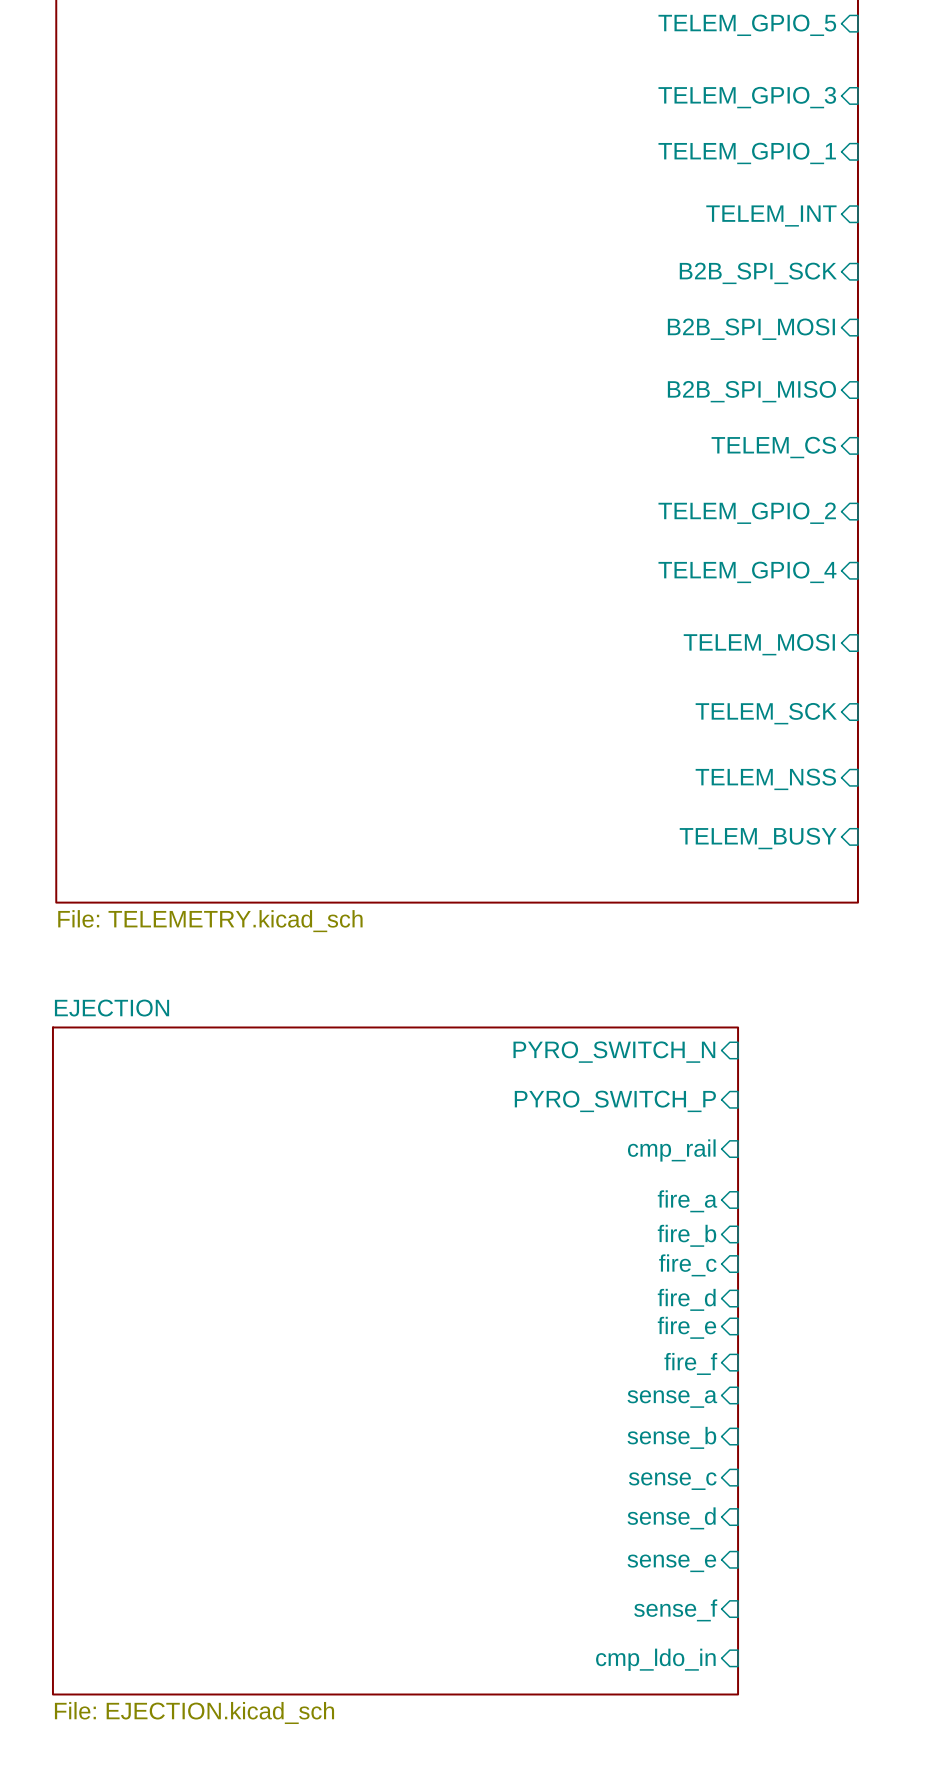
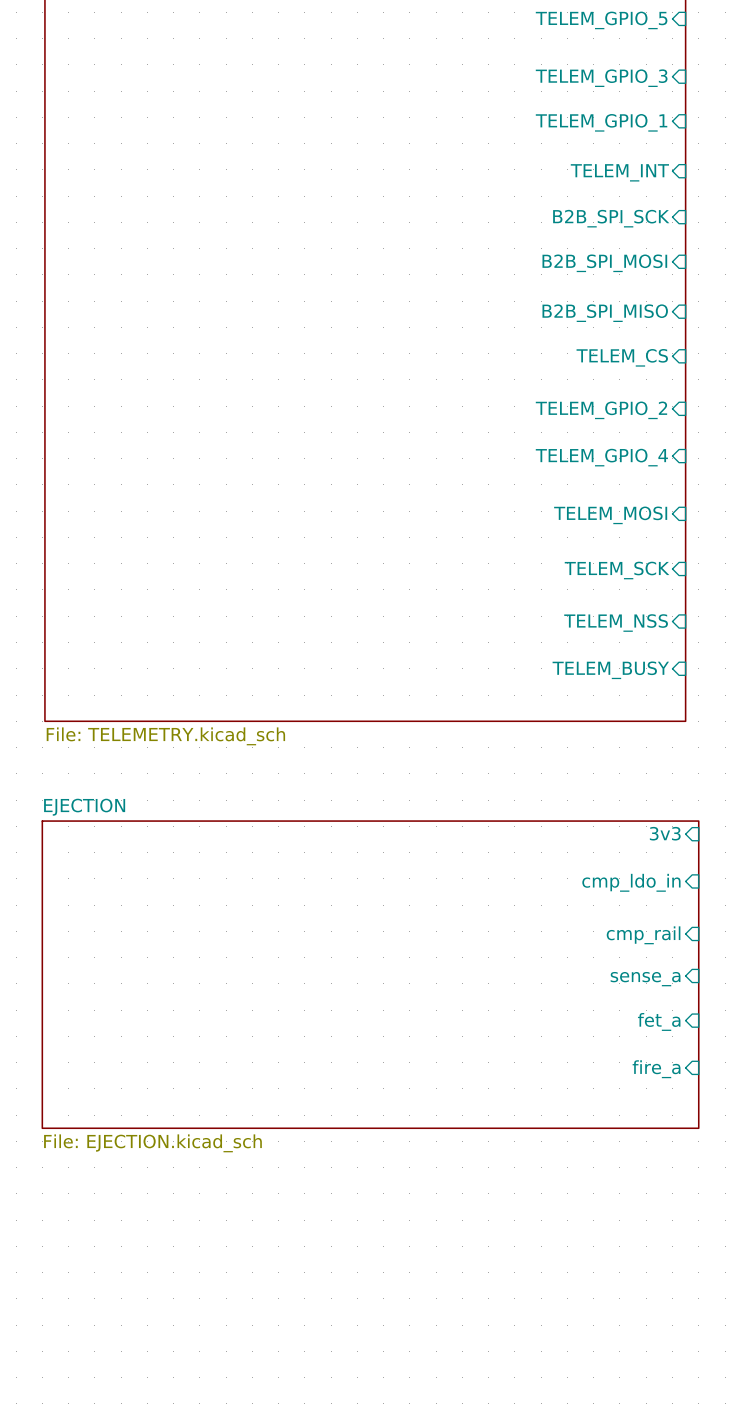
sheet pin: none -> 3v3 (665, 833)
sheet pin: PYRO_SWITCH_N (614, 1052) -> none
sheet pin: PYRO_SWITCH_P (615, 1101) -> none
sheet pin: none -> cmp_ldo_in (631, 882)
sheet pin position: cmp_rail (671, 1150) -> cmp_rail (643, 935)
sheet pin position: fire_a (687, 1201) -> fire_a (656, 1069)
sheet EJECTION: none -> File: EJECTION.kicad_sch (370, 974)
sheet pin: fire_b (686, 1235) -> none
sheet pin: fire_c (687, 1265) -> none
sheet pin: none -> fet_a (659, 1021)
sheet pin: fire_d (686, 1299) -> none
sheet pin: fire_e (686, 1327) -> none
sheet EJECTION: File: EJECTION.kicad_sch (395, 1360) -> none
sheet pin: fire_f (690, 1363) -> none
sheet pin position: sense_a (672, 1399) -> sense_a (645, 979)
sheet pin: sense_b (671, 1437) -> none
sheet pin: sense_c (672, 1481) -> none
sheet pin: sense_d (671, 1518) -> none
sheet pin: sense_e (671, 1563) -> none
sheet pin: sense_f (675, 1610) -> none
sheet pin: cmp_ldo_in (655, 1659) -> none

